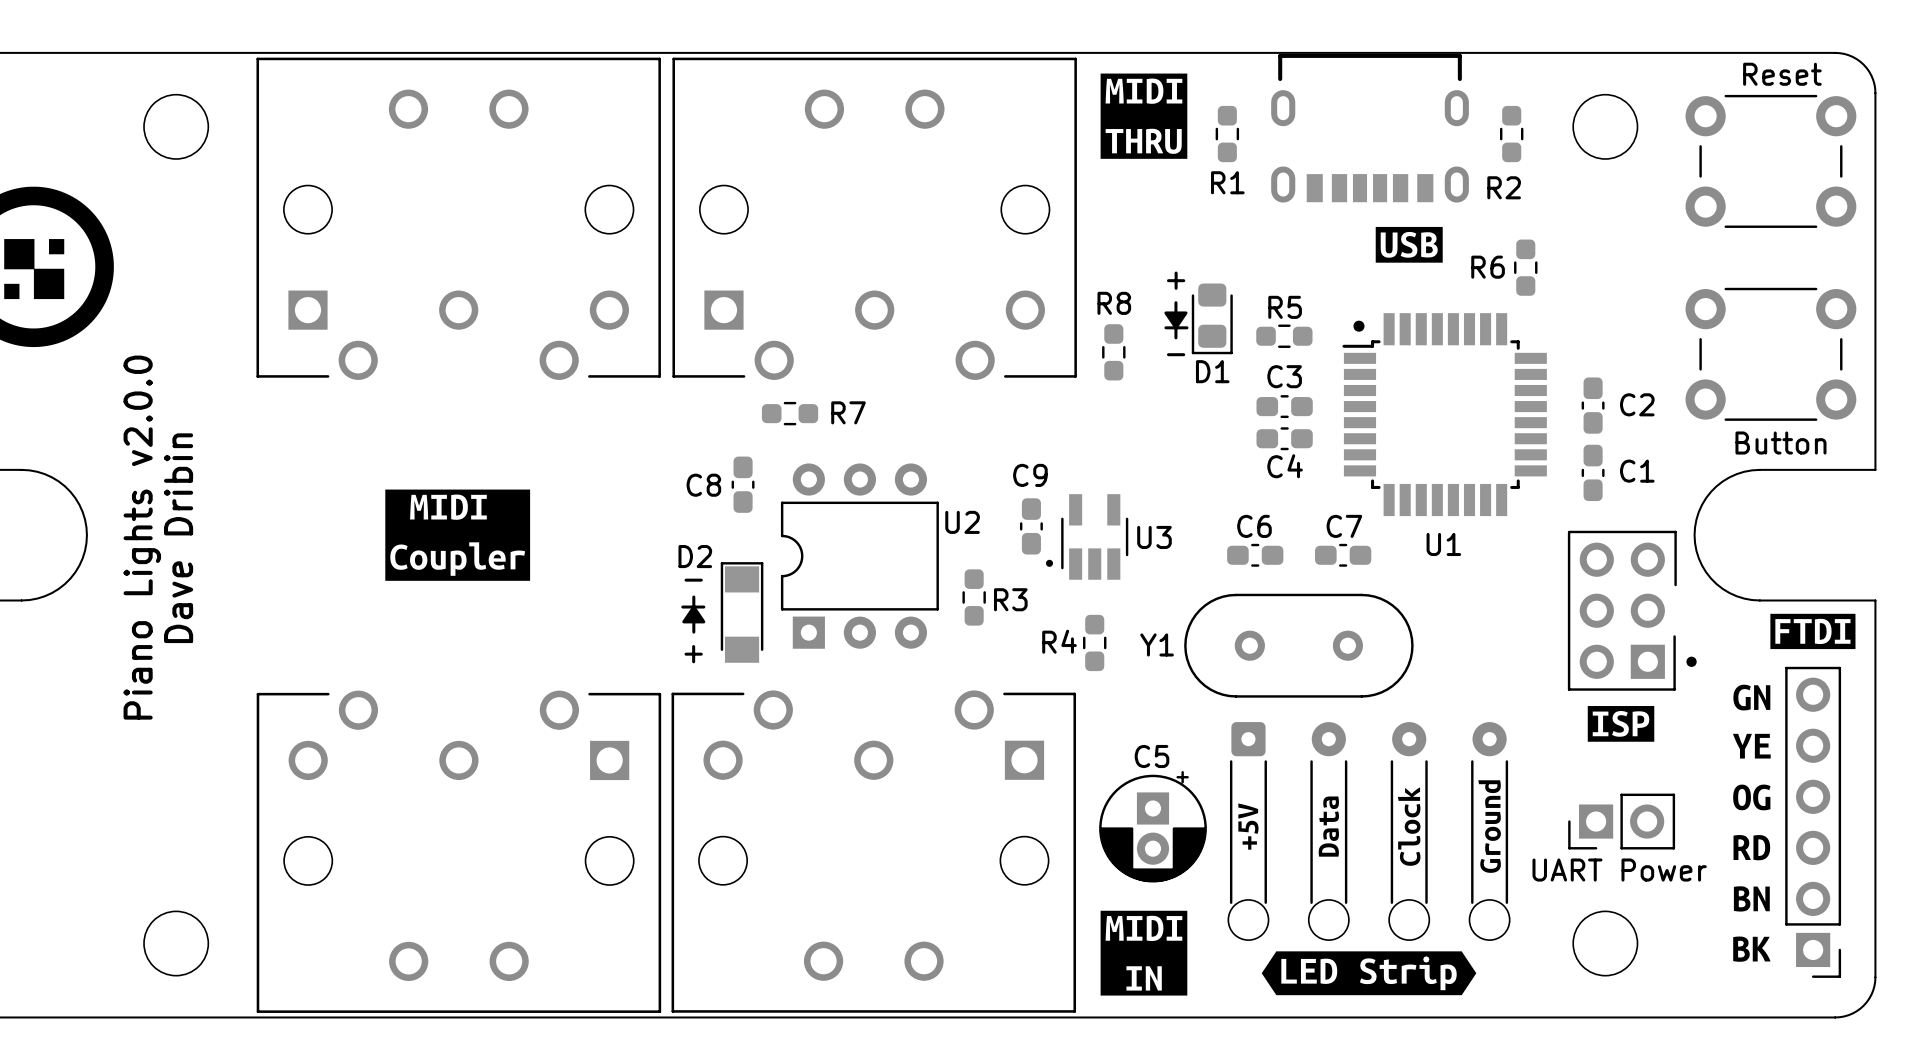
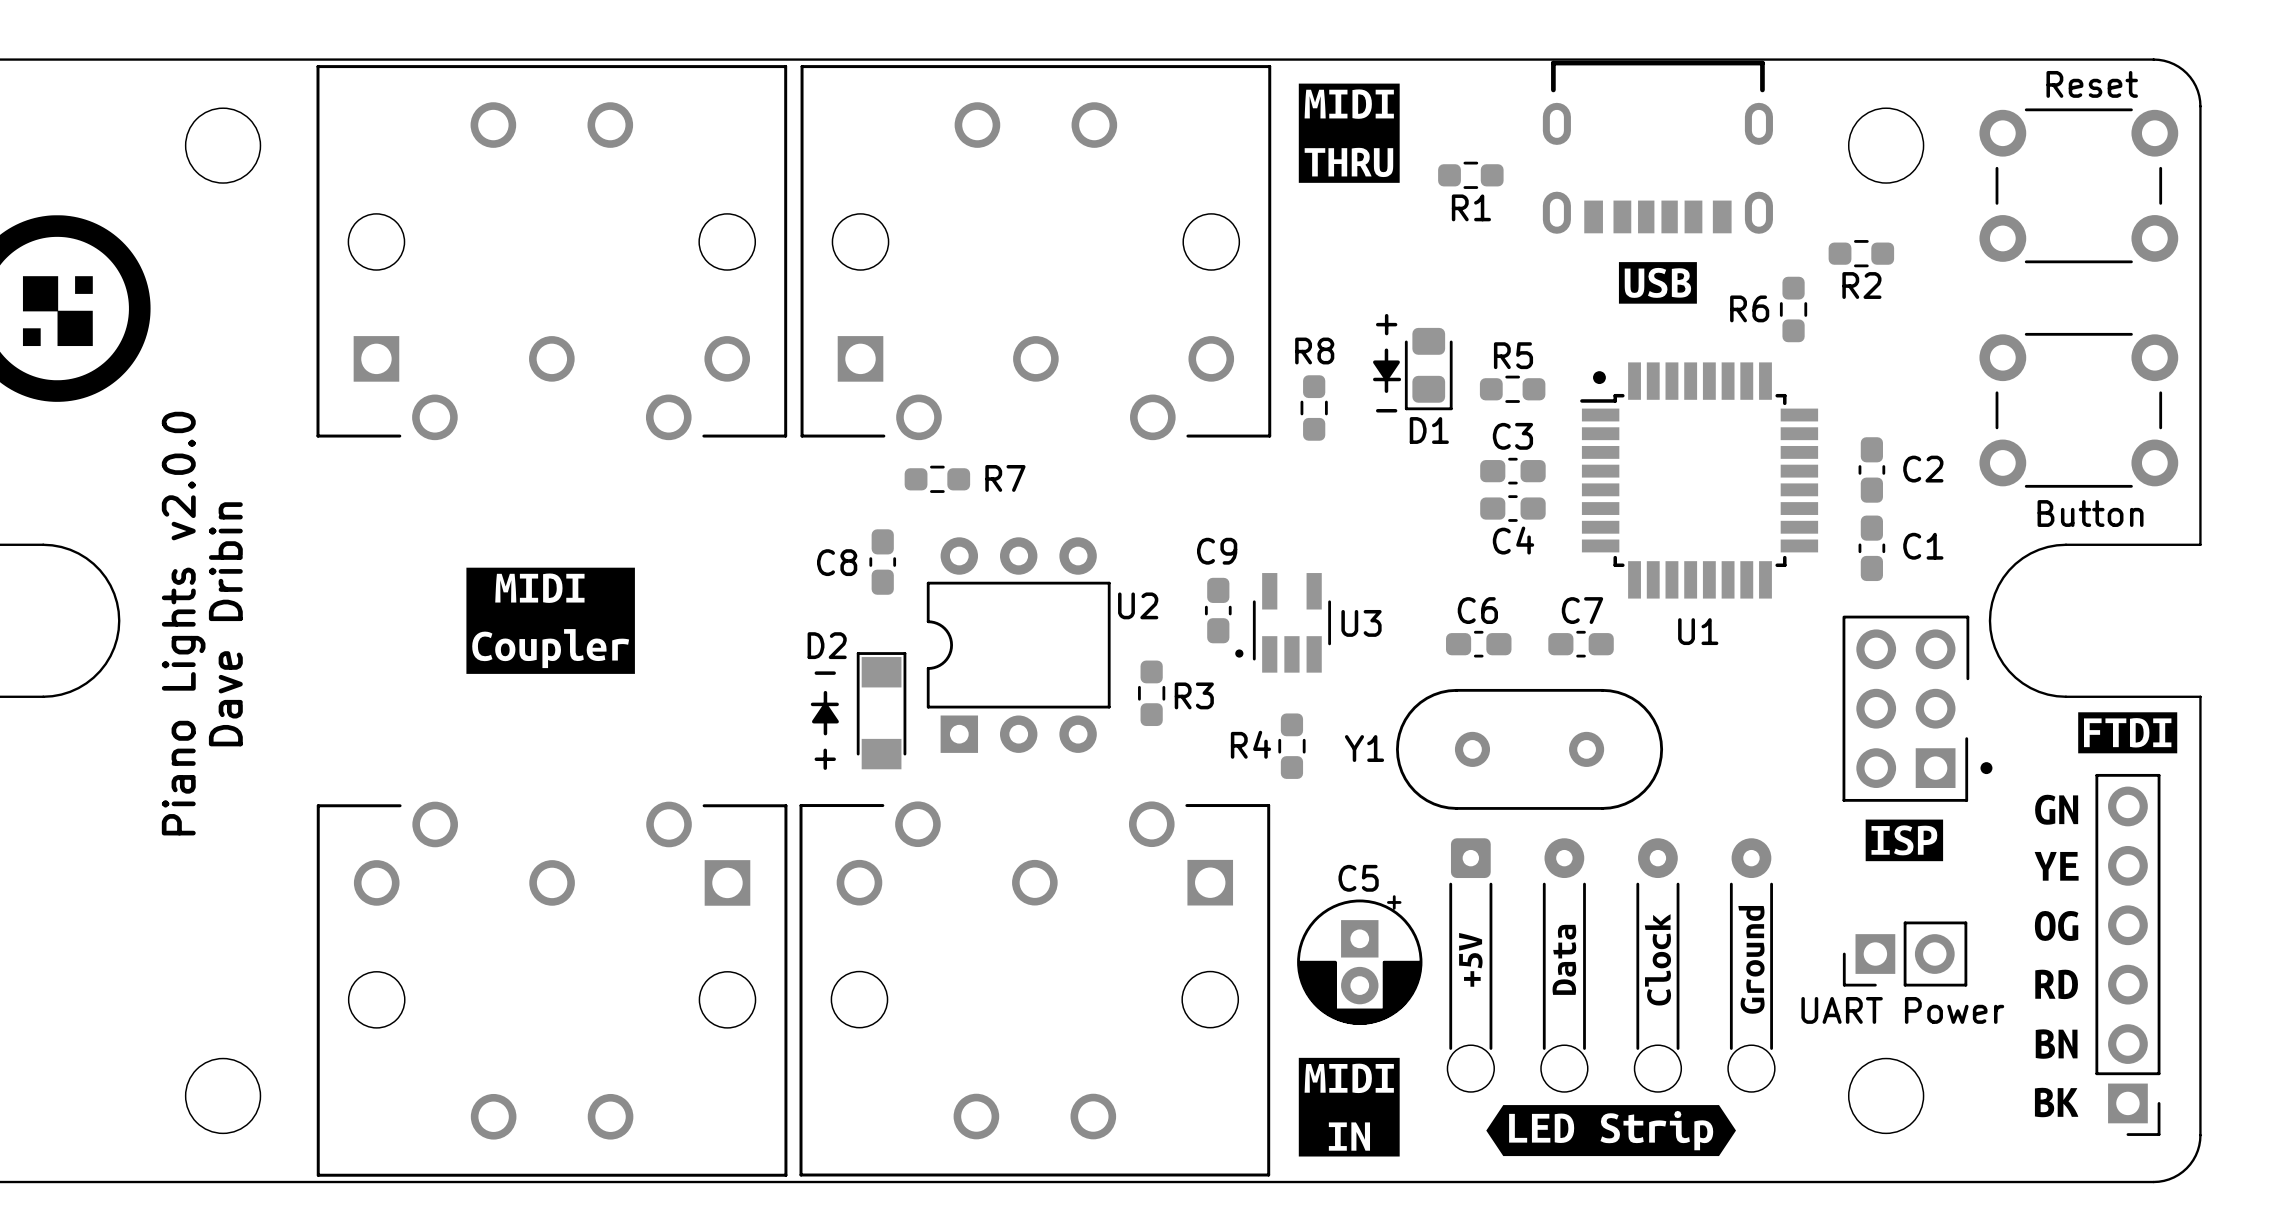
part position: (1370, 128) -> (1657, 147)
R1 rotation: 0° (1227, 134) -> 90° clockwise (1470, 175)
R2 rotation: 0° (1511, 134) -> 90° clockwise (1861, 253)
R2 position: (1511, 134) -> (1861, 253)

